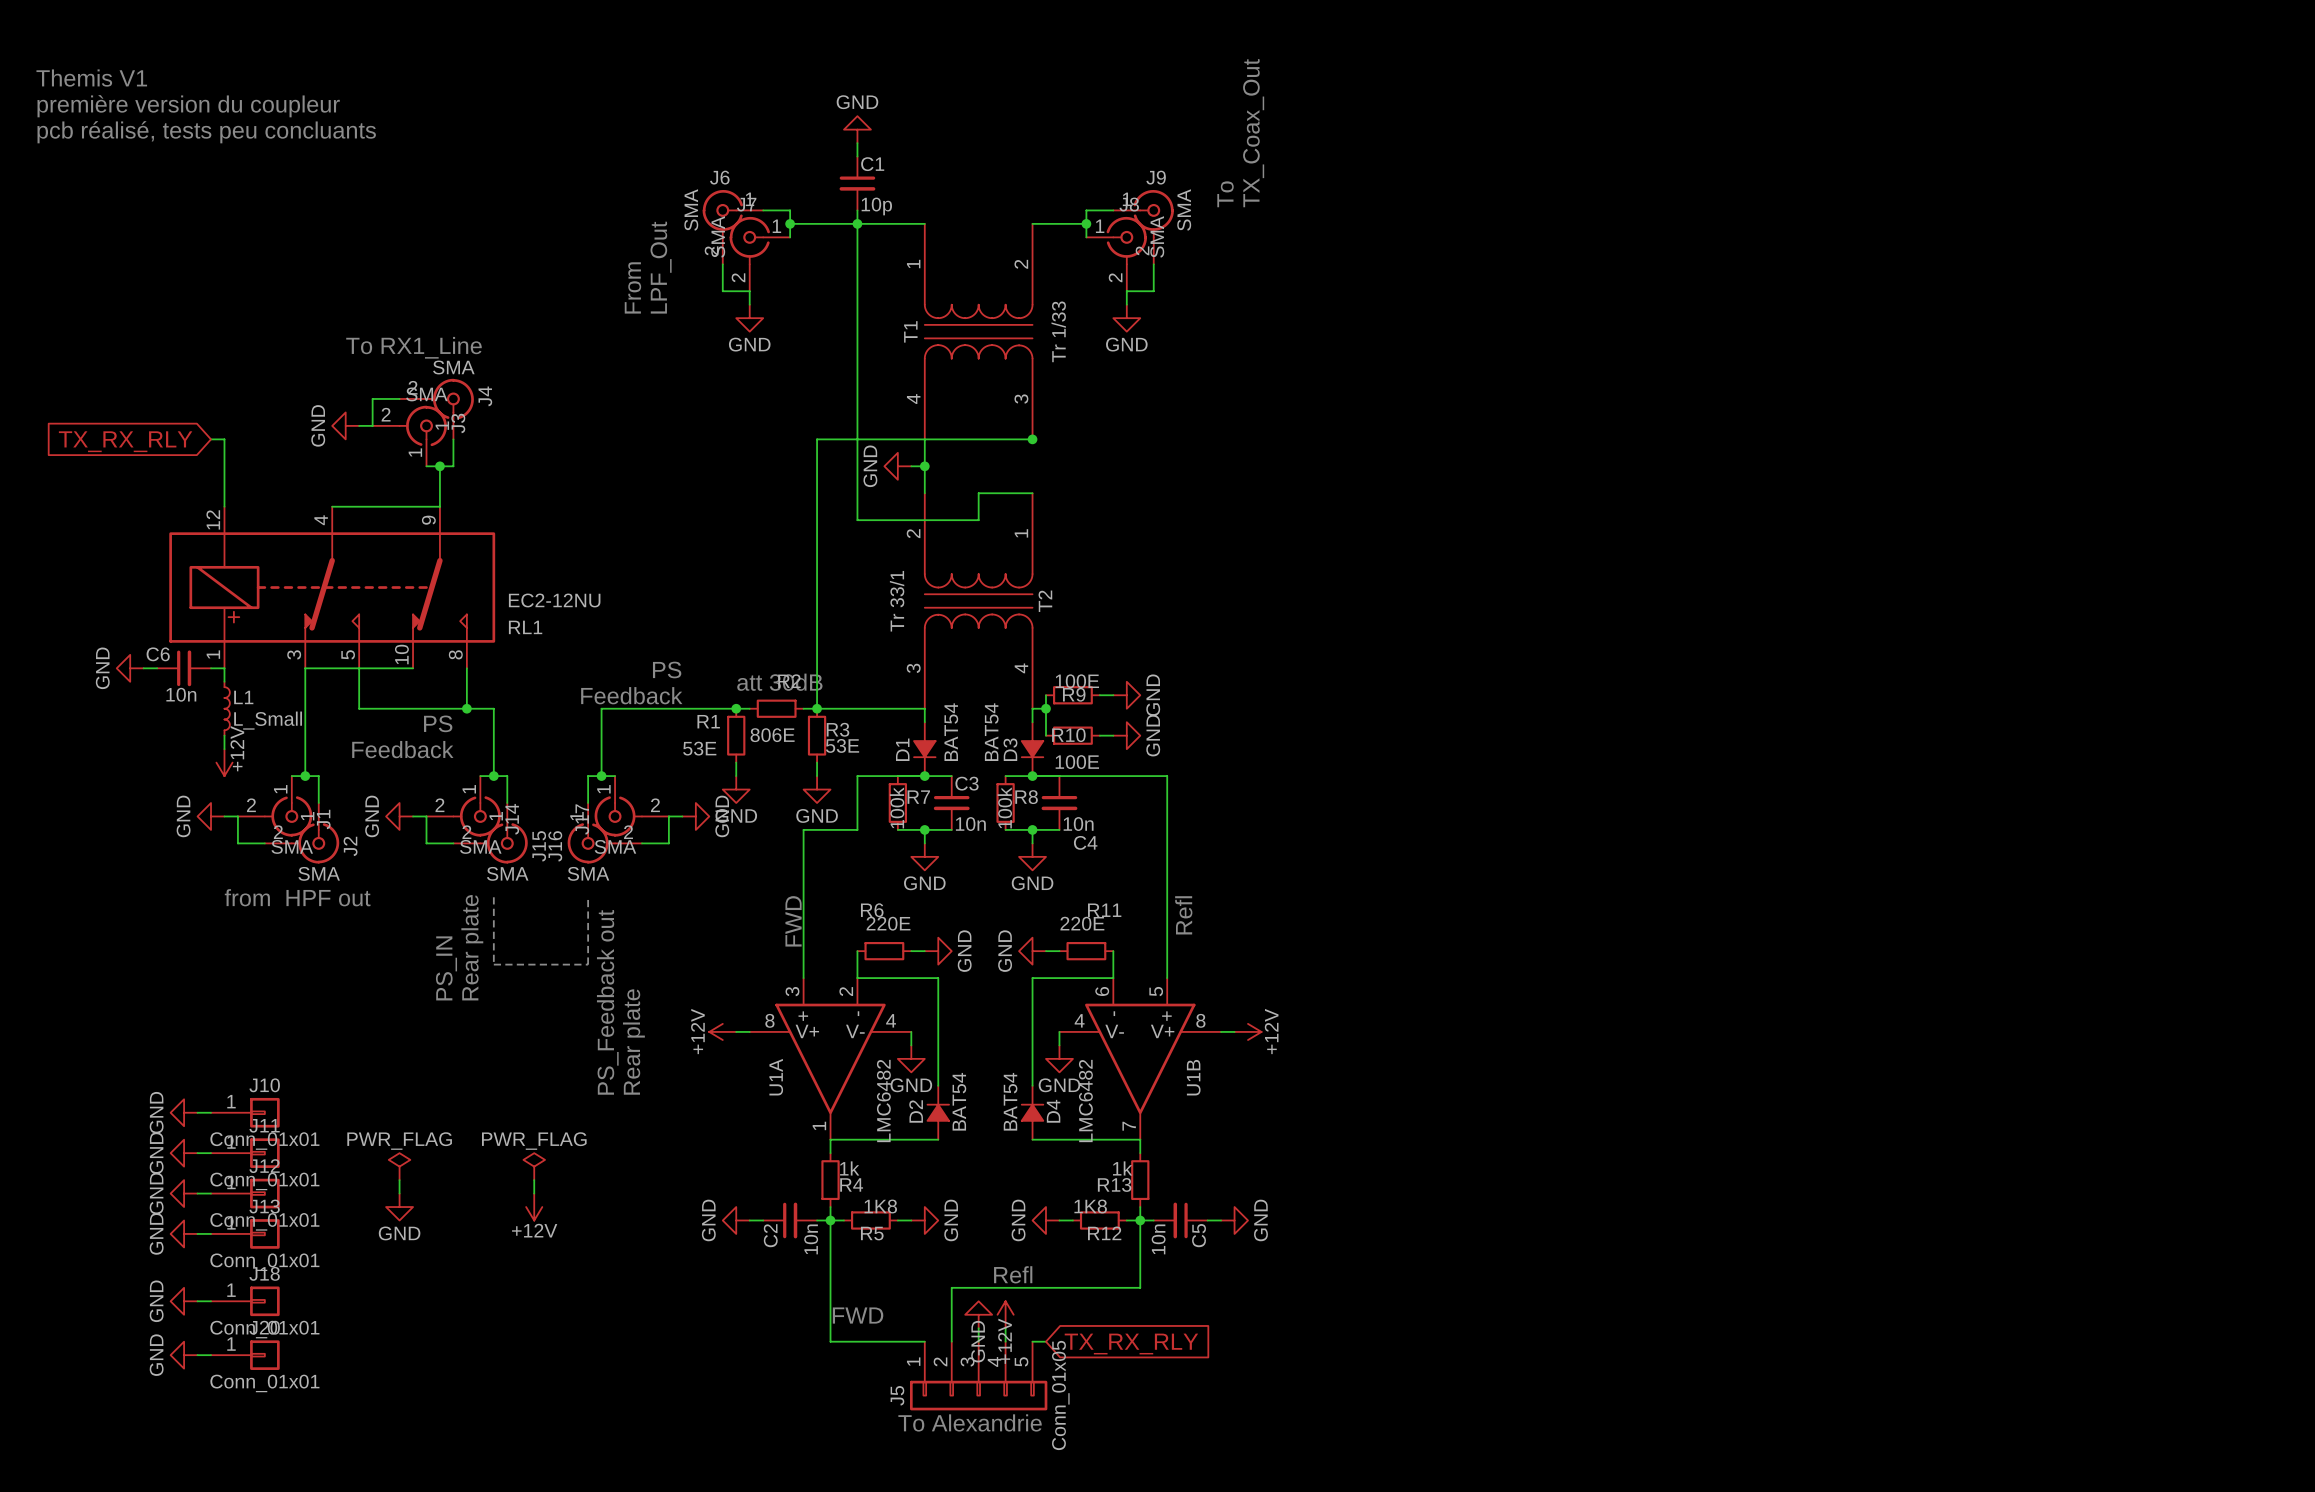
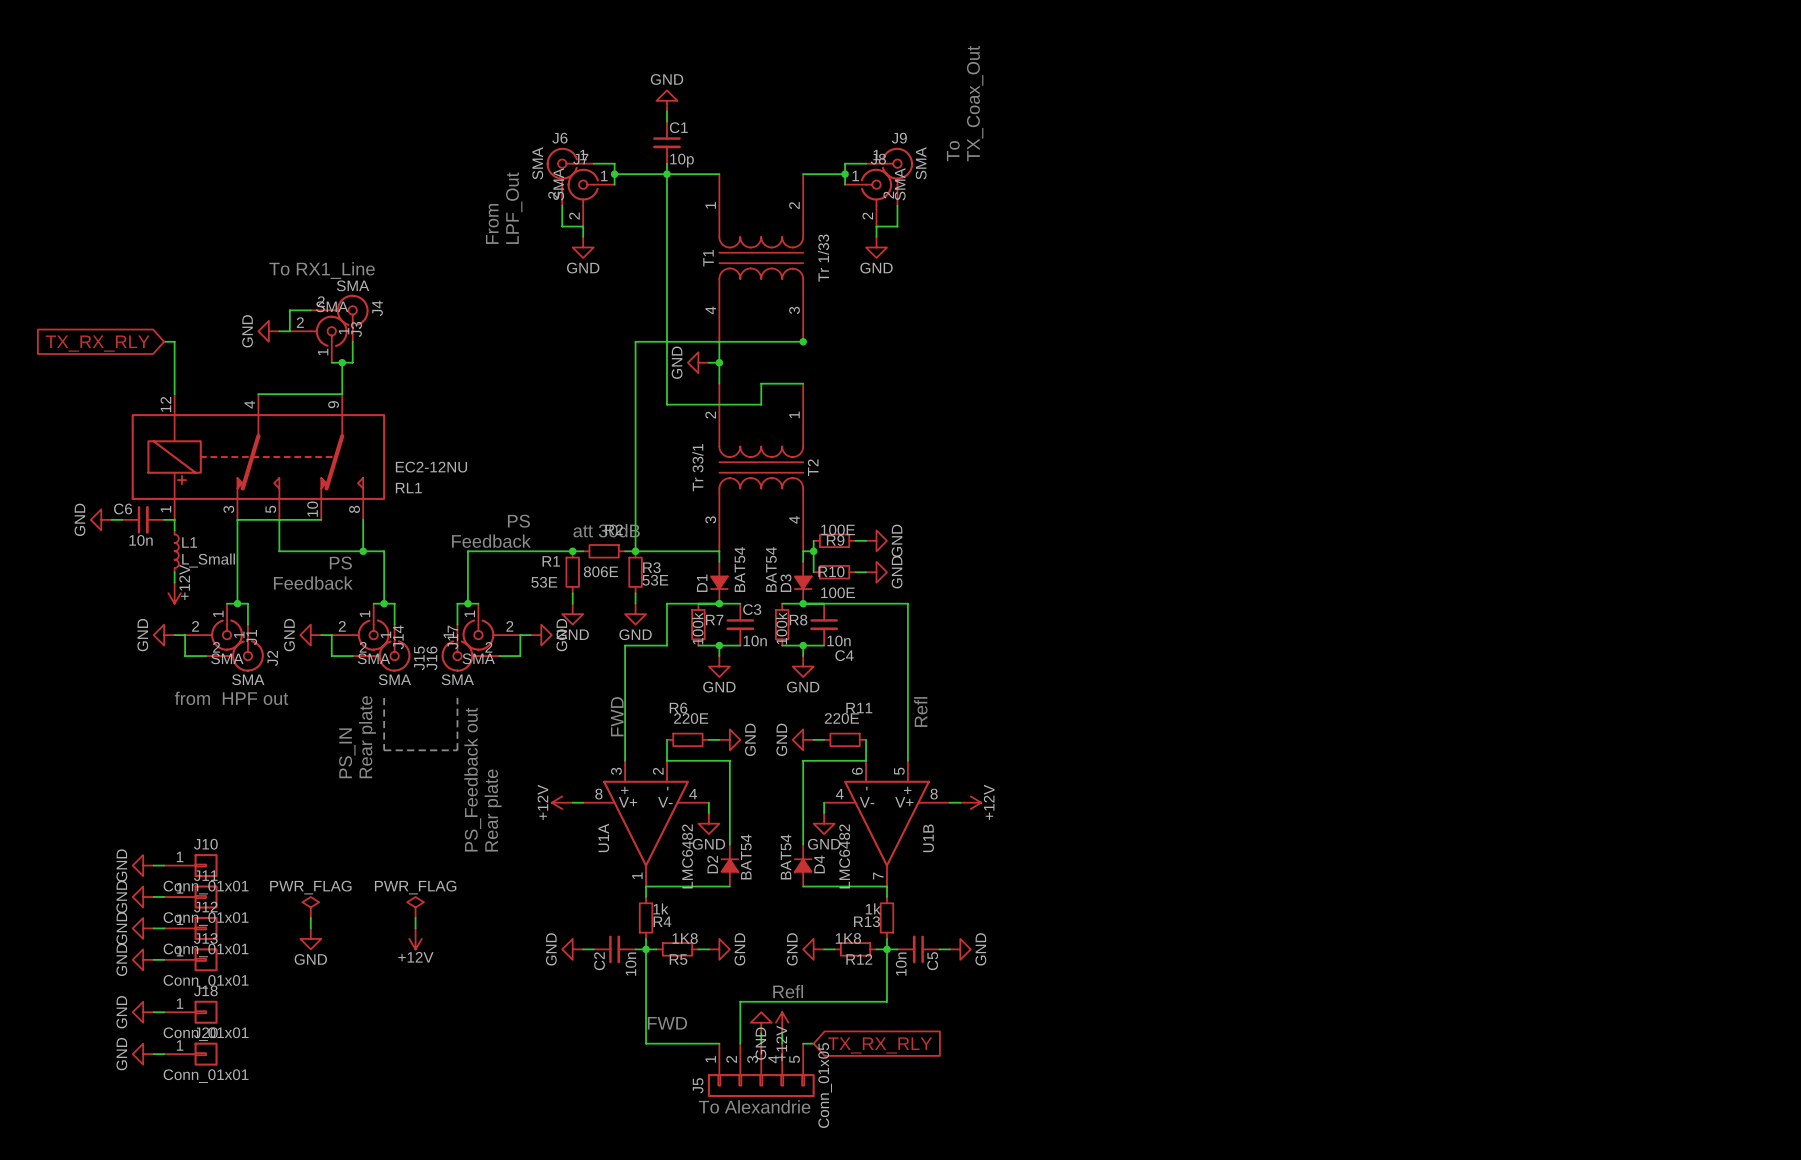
text: Themis V1 (91, 78) -> none
text: première version du coupleur (188, 106) -> none
text: pcb réalisé, tests peu concluants (206, 132) -> none

